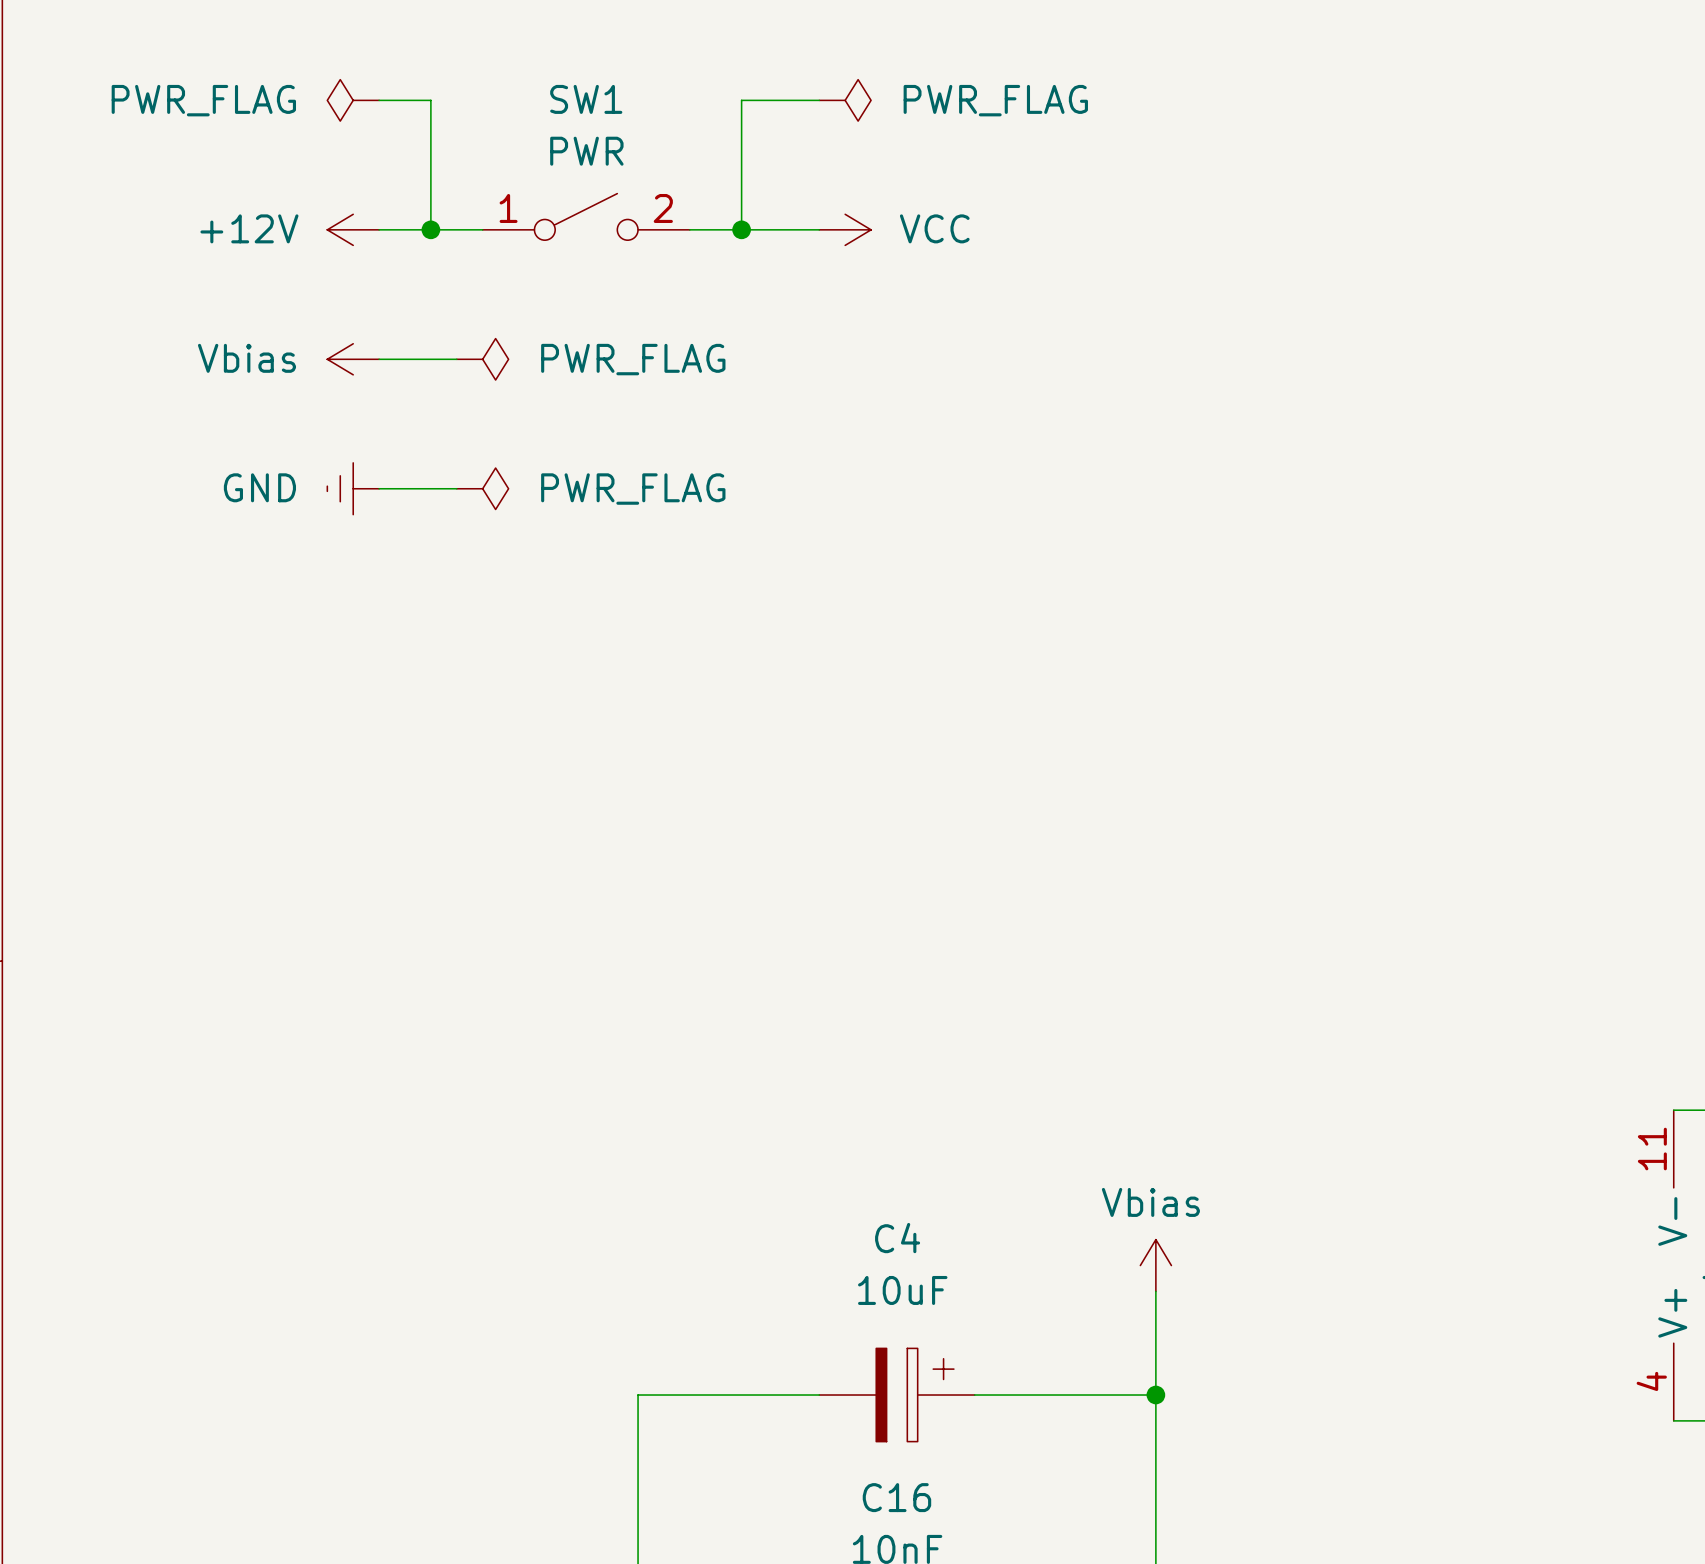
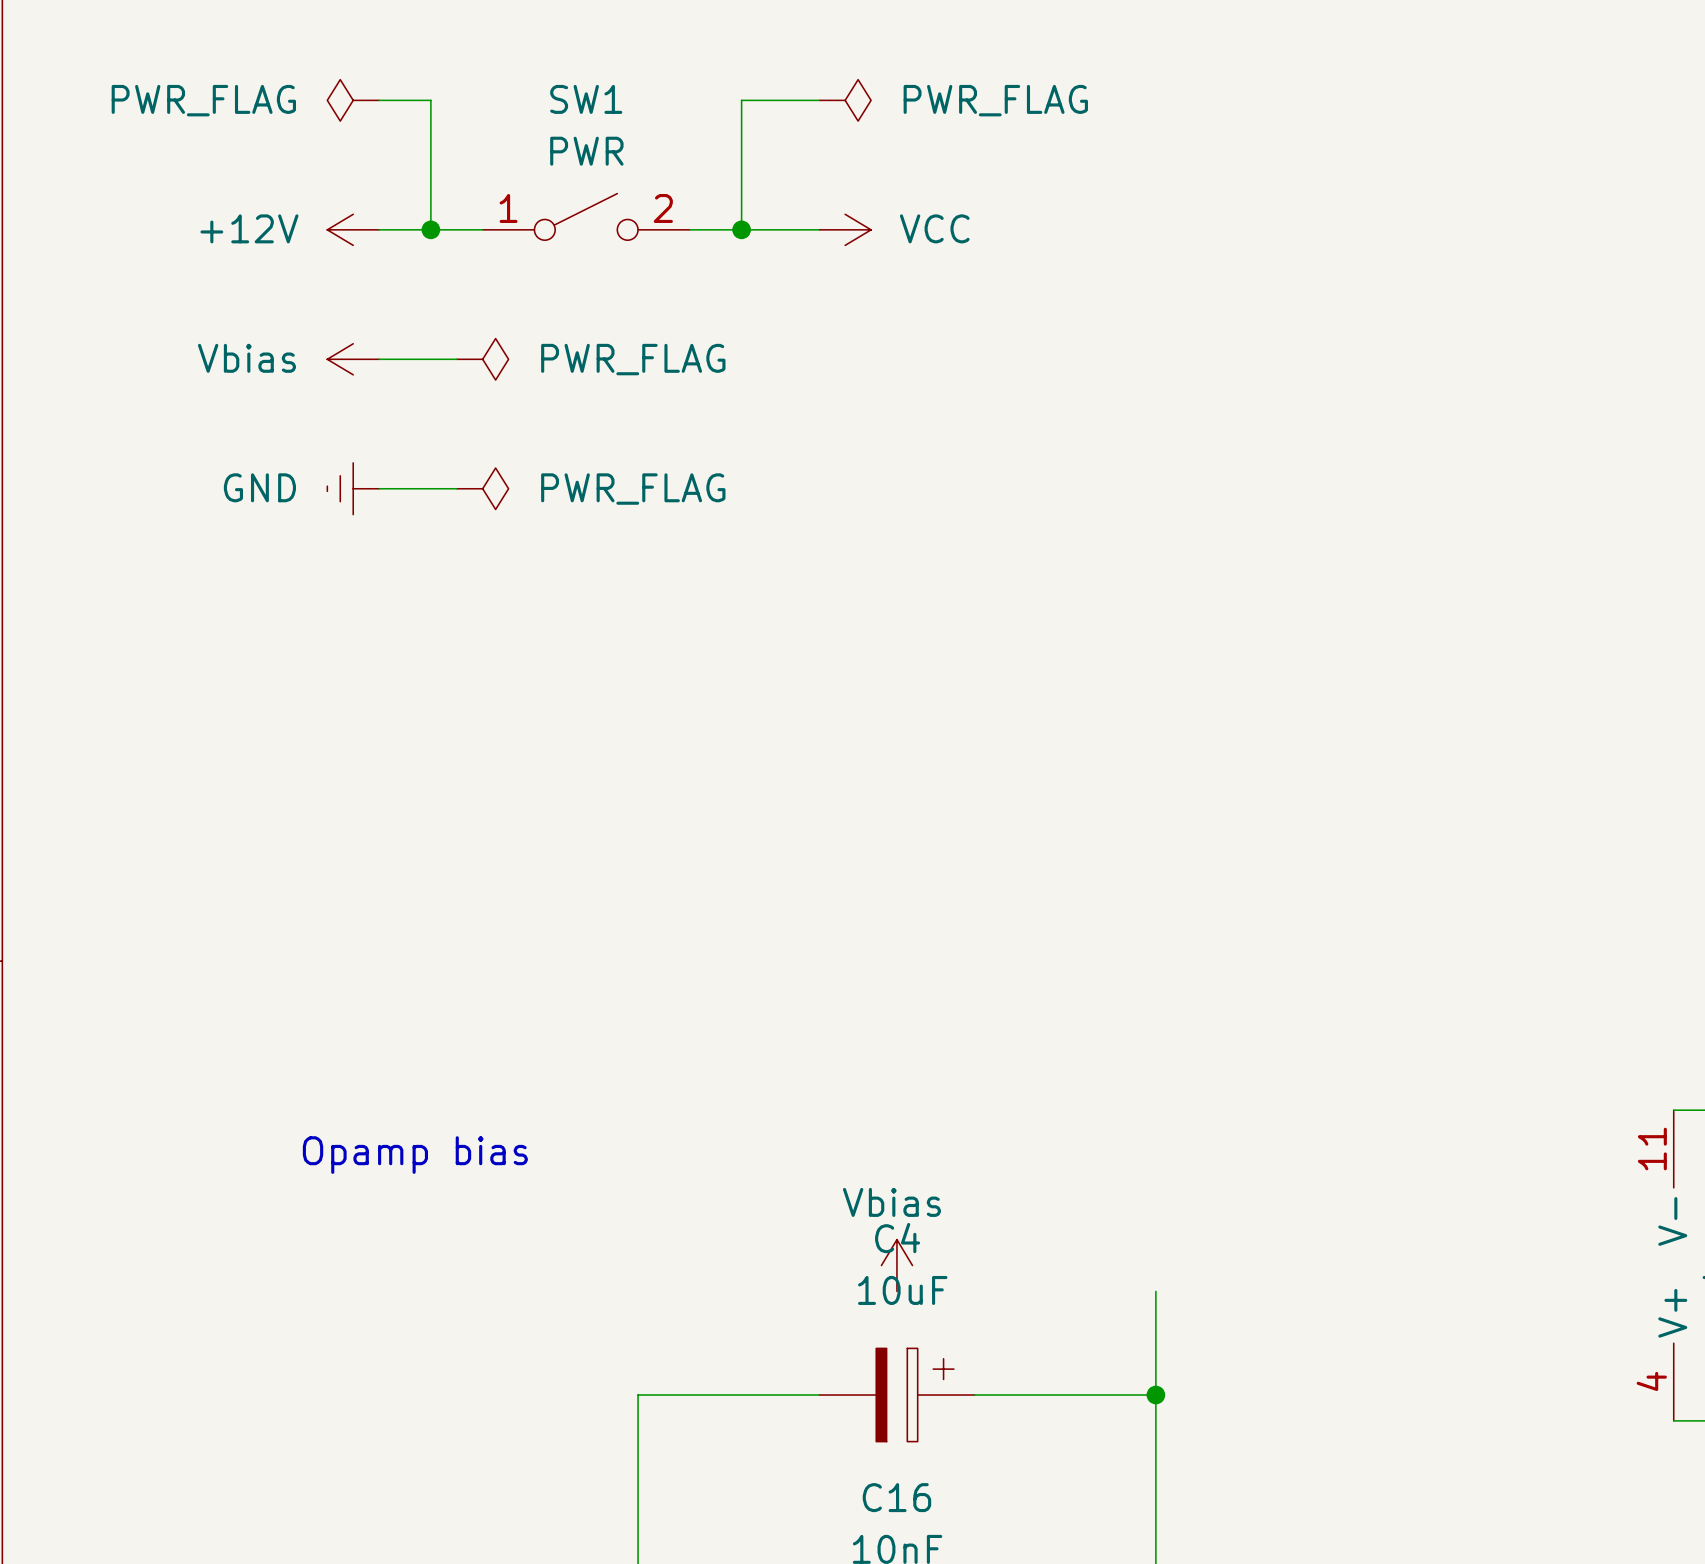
text: none -> Opamp bias (415, 1155)
power symbol position: Vbias (1155, 1265) -> Vbias (896, 1265)

